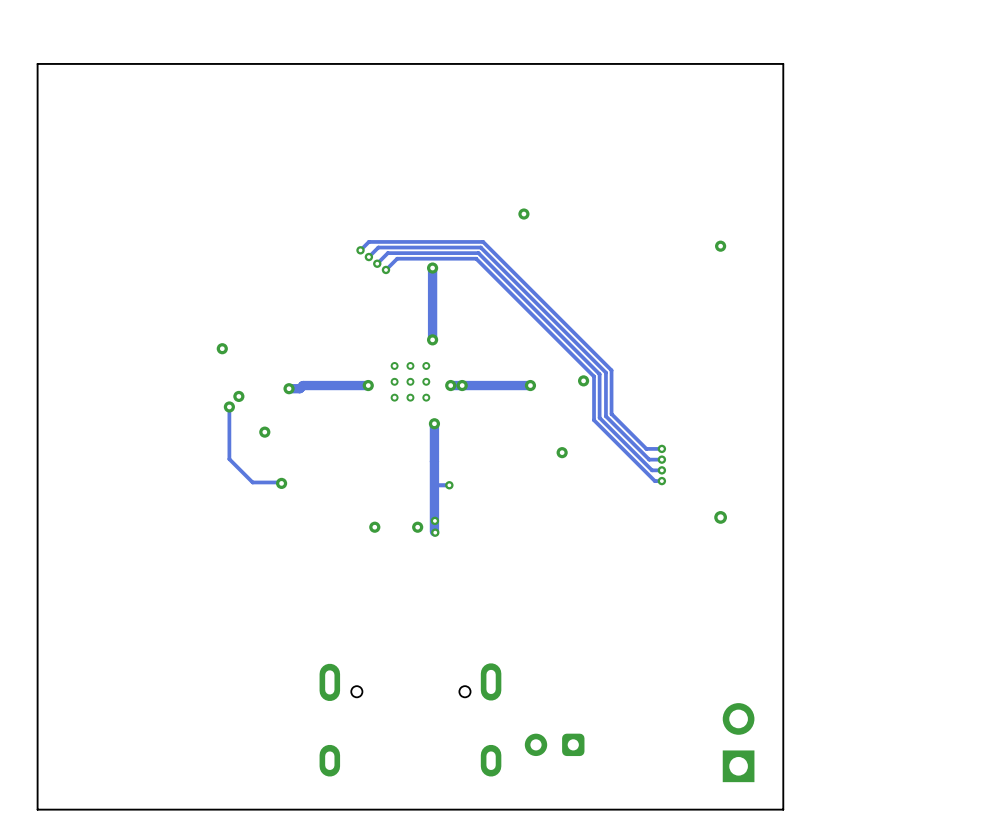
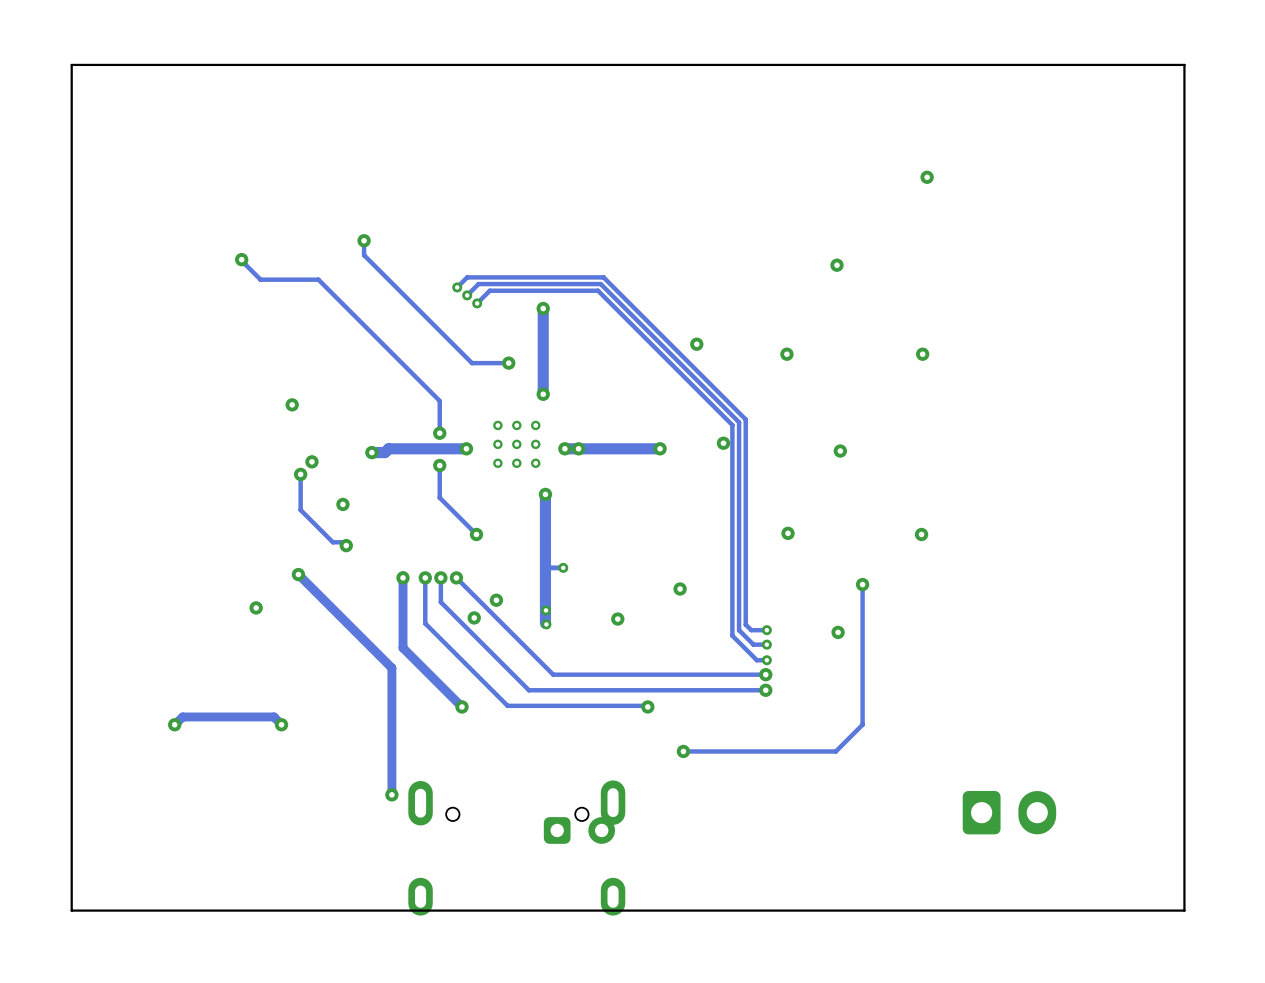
board edge: (783, 63) (783, 809) (37, 809) (37, 772) -> (961, 64) (1184, 64) (1184, 910) (71, 910)
via: none -> (927, 177)
track: none -> (364, 240) (364, 255) (472, 363) (508, 363)
via: none -> (364, 240)
via: (523, 214) -> none
track: none -> (241, 259) (260, 279) (318, 279) (439, 400) (439, 433)
via: none -> (241, 259)
via: none -> (836, 265)
via: (720, 246) -> none
track: (385, 269) (397, 258) (476, 258) (594, 376) (594, 420) (654, 481) (661, 481) -> none
via: (385, 269) -> none
via: none -> (696, 344)
via: none -> (786, 354)
via: none -> (922, 354)
via: none -> (508, 363)
track: (602, 361) (611, 370) (611, 414) (646, 448) (661, 448) -> (745, 419) (745, 624) (751, 630) (766, 630)
track: (596, 363) (605, 372) (605, 416) (649, 459) (661, 459) -> (739, 422) (739, 630) (753, 644) (766, 644)
track: (591, 365) (599, 374) (599, 417) (652, 470) (661, 470) -> (732, 425) (732, 635) (756, 660) (766, 660)
via: none -> (439, 433)
via: none -> (840, 451)
track: none -> (439, 465) (439, 497) (476, 534)
via: none -> (439, 465)
track: (229, 436) (229, 459) (252, 482) (281, 483) -> (300, 510) (332, 542) (342, 542) (346, 545)
via: (661, 448) -> none
via: (562, 452) -> none
via: none -> (788, 533)
via: none -> (476, 534)
via: none -> (921, 534)
via: (661, 459) -> none
via: none -> (346, 545)
via: (661, 470) -> none
via: (661, 481) -> none
via: (281, 483) -> none
track: none -> (298, 574) (391, 668) (391, 794)
via: none -> (298, 574)
track: none -> (403, 575) (403, 647) (462, 706)
via: none -> (403, 577)
track: none -> (425, 577) (425, 623) (507, 705) (647, 706)
via: none -> (425, 577)
track: none -> (440, 577) (440, 602) (528, 690) (765, 690)
via: none -> (440, 577)
track: none -> (456, 577) (553, 674) (765, 674)
via: none -> (456, 577)
track: none -> (862, 584) (862, 724) (835, 751) (683, 751)
via: none -> (862, 584)
via: none -> (680, 589)
via: (720, 517) -> none
via: none -> (256, 607)
via position: (417, 527) -> (496, 600)
via: none -> (617, 619)
via: none -> (766, 630)
via: none -> (838, 632)
via: none -> (766, 644)
via: none -> (766, 660)
via: none -> (765, 674)
via: none -> (765, 690)
via: none -> (462, 706)
via: none -> (647, 706)
via: none -> (174, 724)
track: none -> (281, 724) (273, 716) (182, 716) (174, 724)
via: none -> (281, 724)
via: none -> (683, 751)
via: none -> (391, 794)
part: none -> (1009, 812)
part: (738, 742) -> none
part rotation: 0° (554, 744) -> 180° (579, 830)
part position: (554, 744) -> (579, 830)

